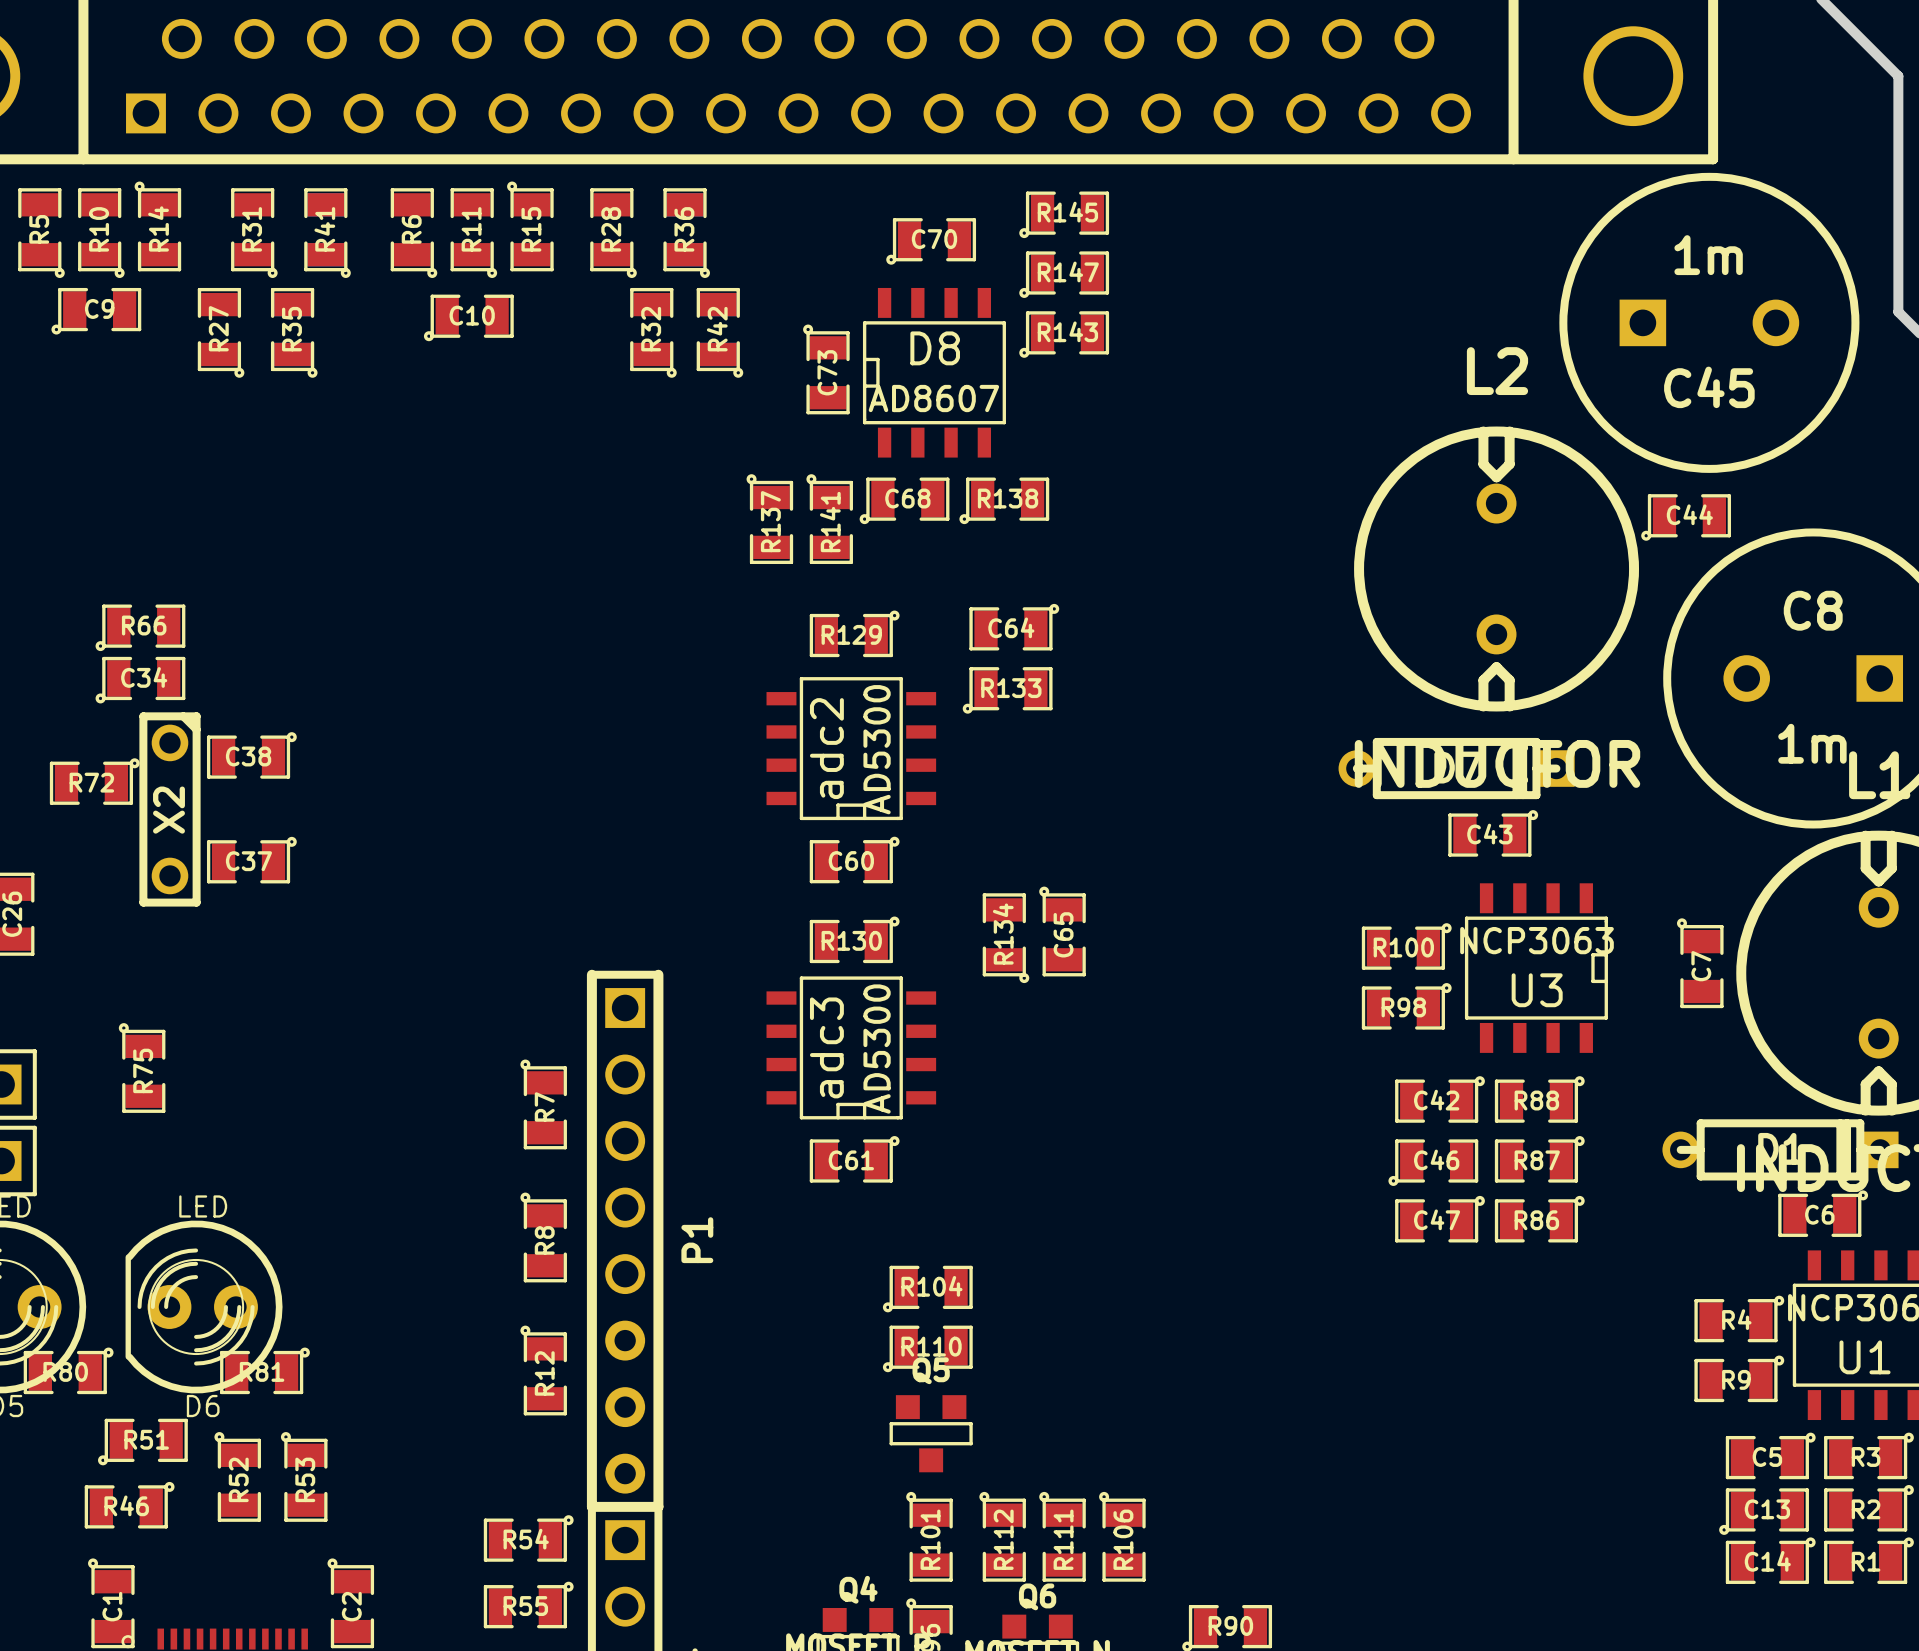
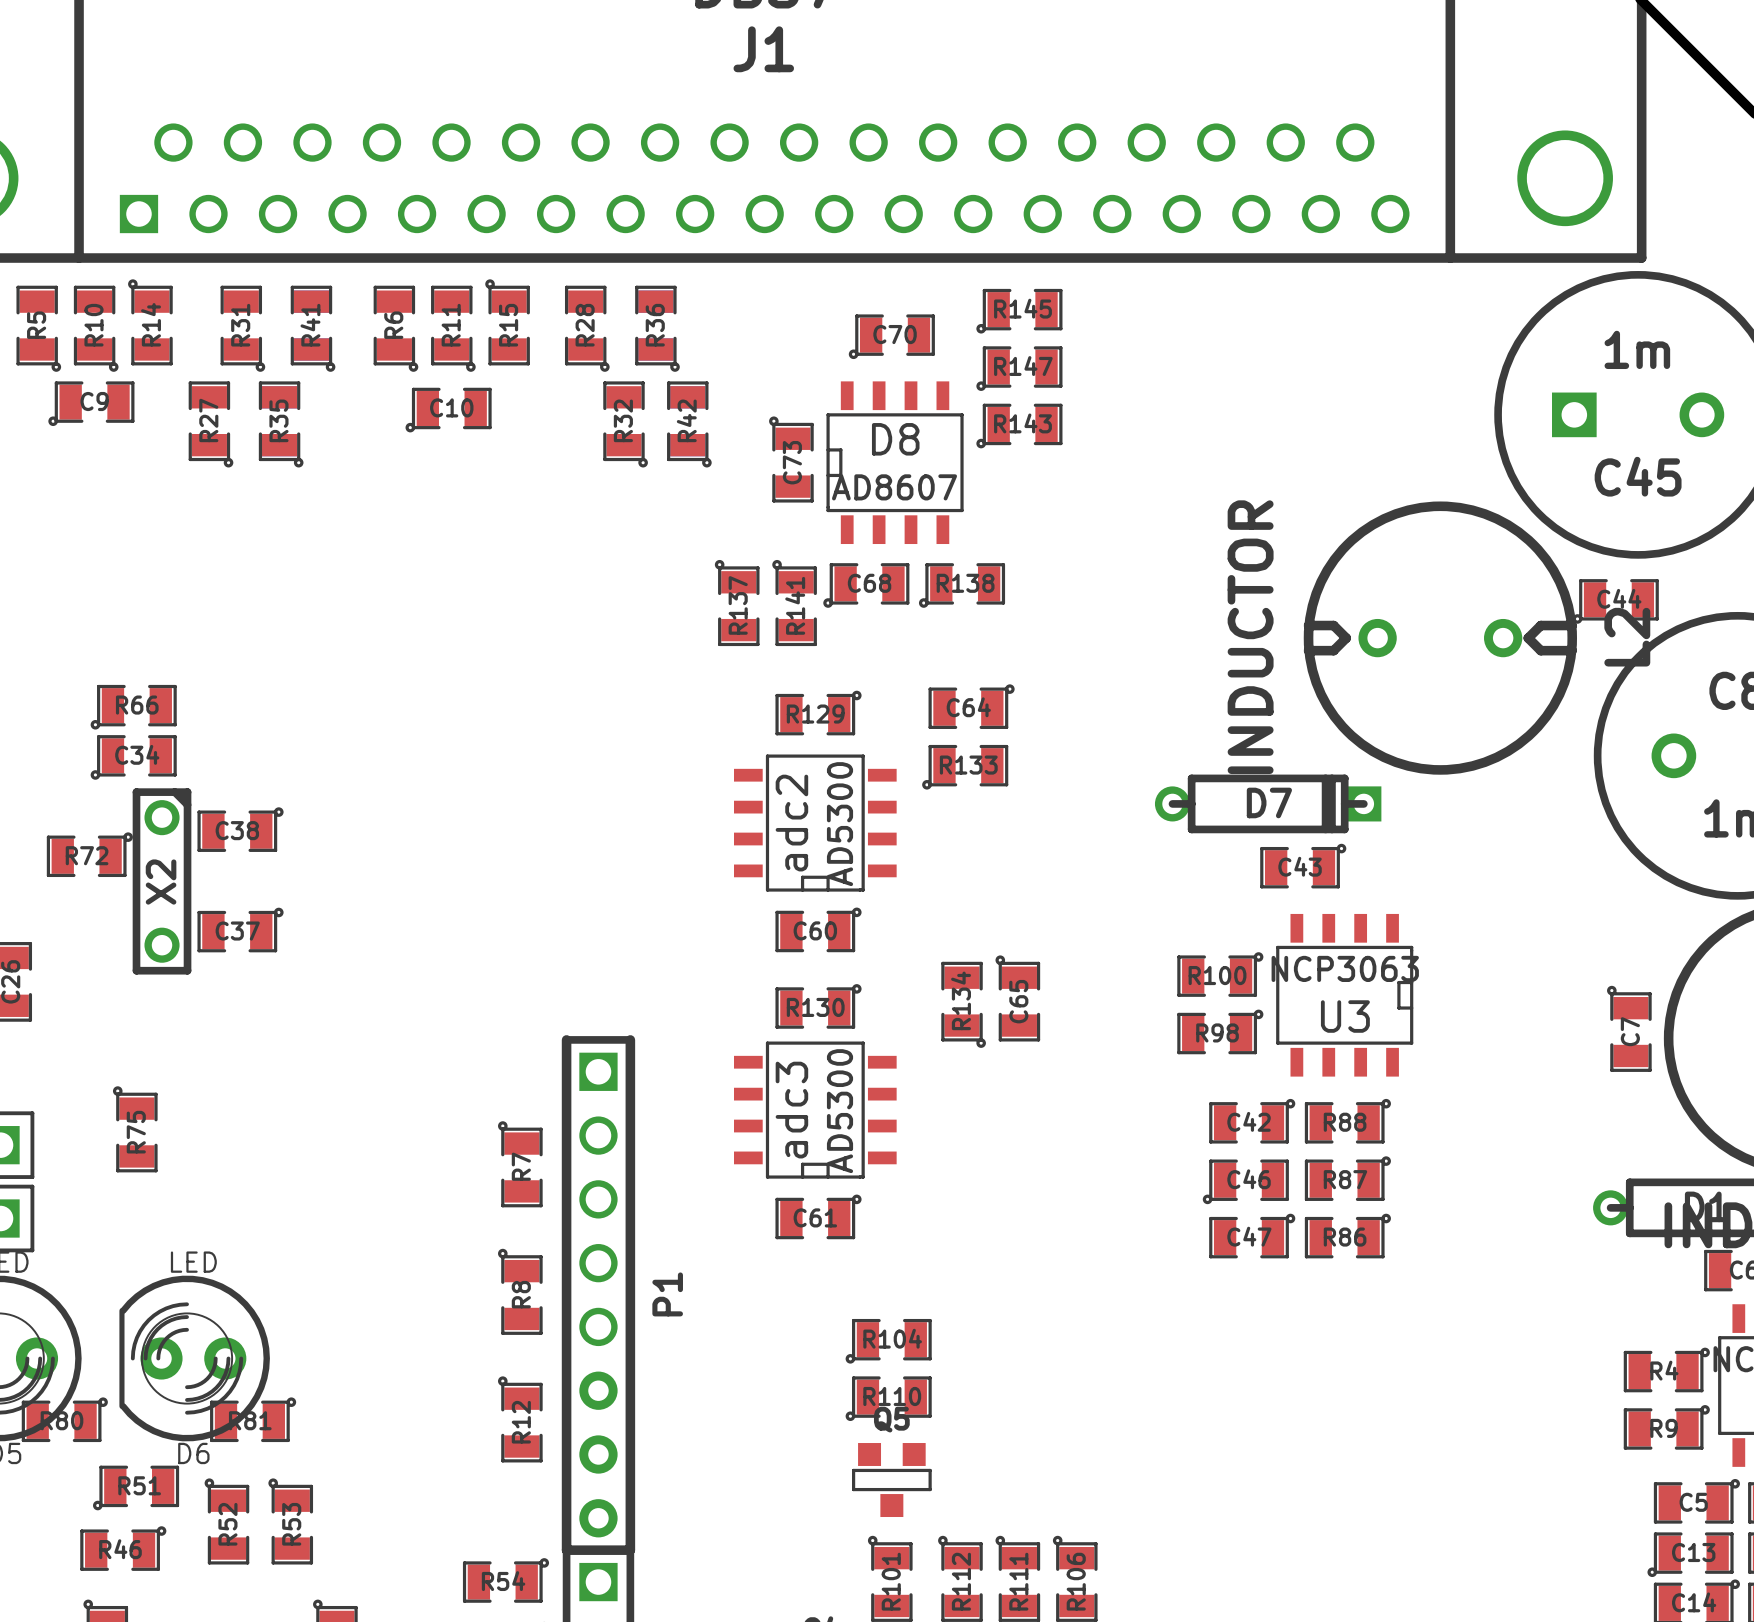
L2 rotation: 0° (1496, 568) -> 90° clockwise (1440, 638)
D7 position: (1456, 768) -> (1268, 803)
C43 position: (1493, 833) -> (1303, 866)
R100 position: (1406, 946) -> (1220, 974)
U3 position: (1536, 968) -> (1344, 995)
R98 position: (1406, 1006) -> (1220, 1031)
C42 position: (1440, 1099) -> (1252, 1121)
R88 position: (1539, 1099) -> (1347, 1121)
R87 position: (1539, 1159) -> (1347, 1178)
C46 position: (1433, 1162) -> (1245, 1181)
C47 position: (1440, 1219) -> (1252, 1236)
R86 position: (1539, 1219) -> (1347, 1236)

